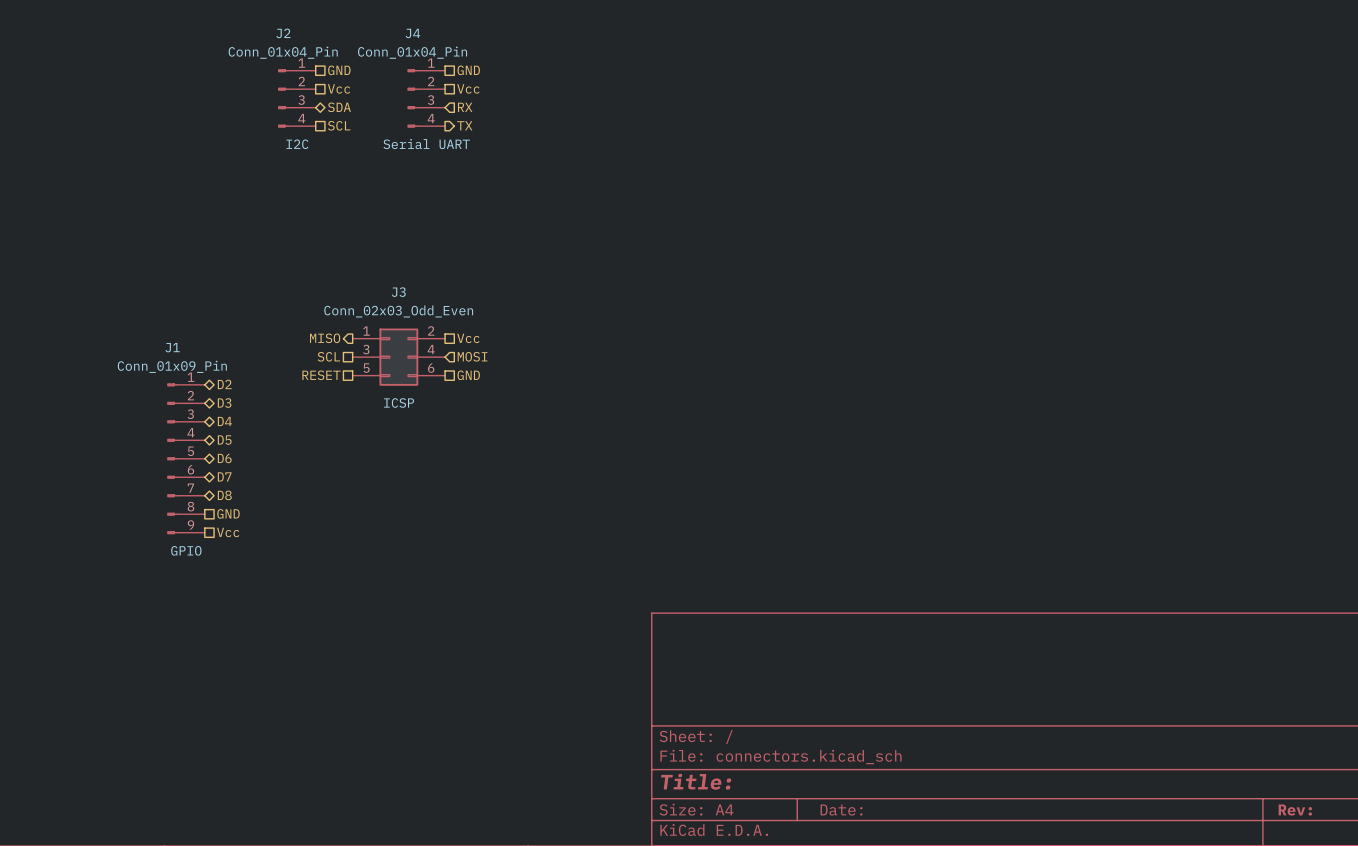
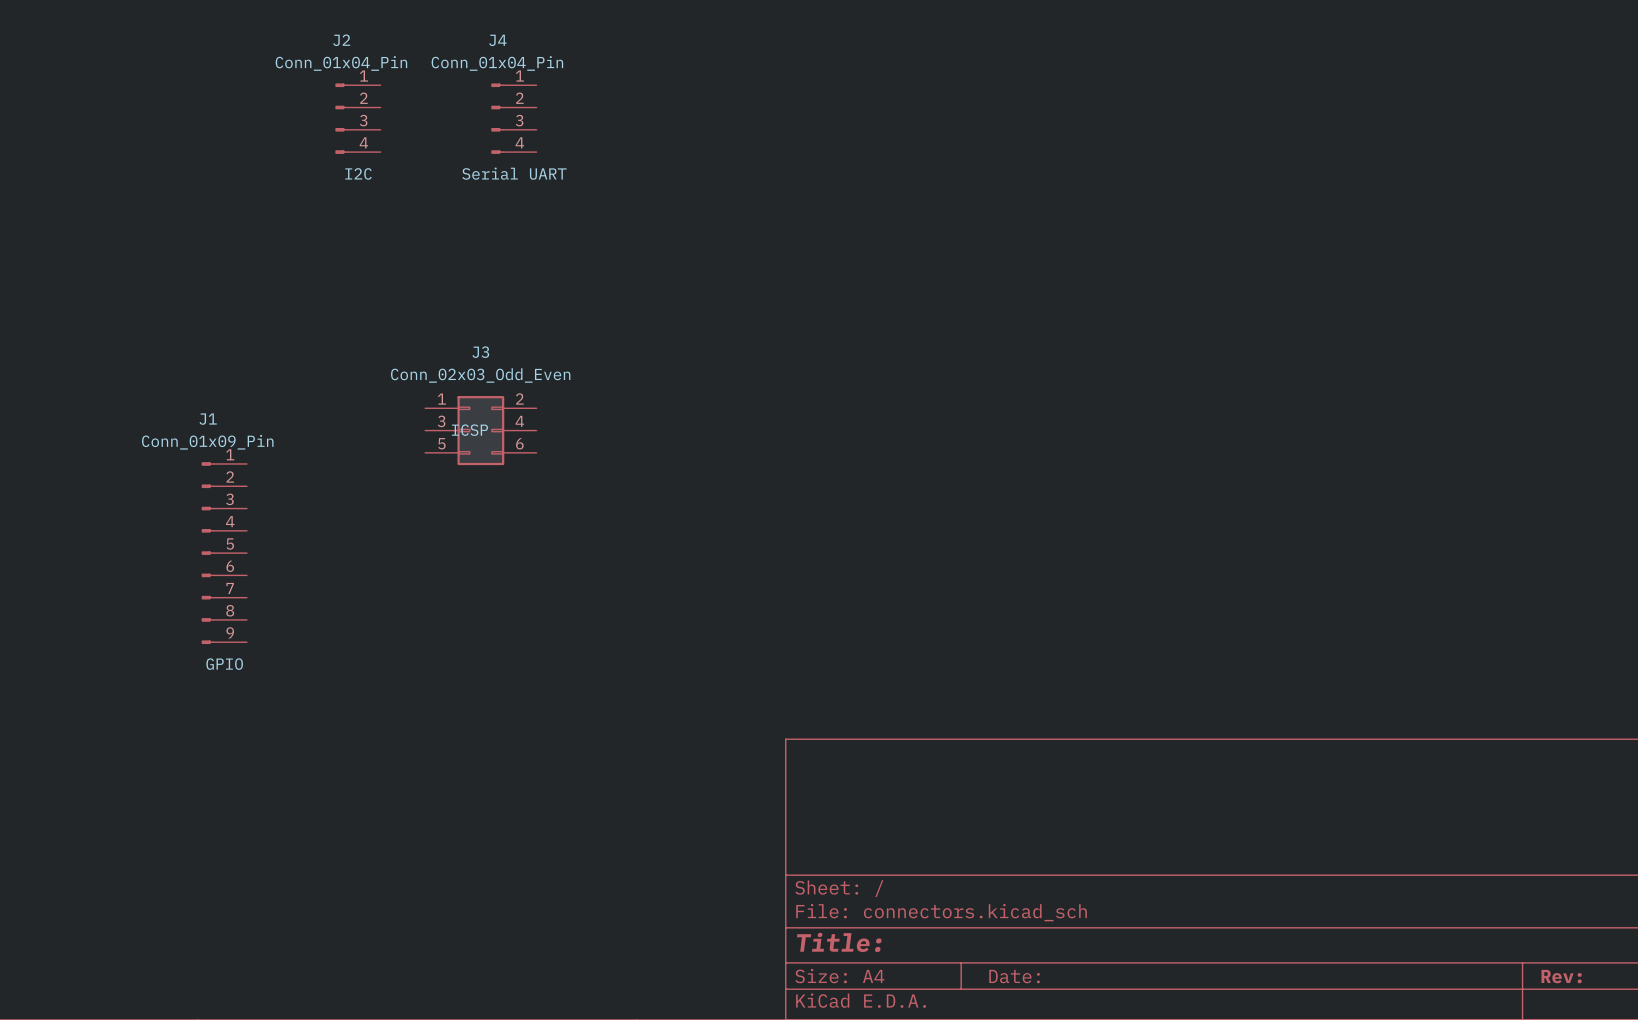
hierarchical label: GND (339, 70) -> none
hierarchical label: GND (468, 70) -> none
hierarchical label: Vcc (339, 88) -> none
hierarchical label: Vcc (468, 88) -> none
hierarchical label: SDA (339, 107) -> none
hierarchical label: RX (465, 107) -> none
hierarchical label: SCL (339, 125) -> none
hierarchical label: TX (464, 125) -> none
hierarchical label: MISO (325, 338) -> none
hierarchical label: Vcc (468, 338) -> none
hierarchical label: SCL (328, 356) -> none
hierarchical label: MOSI (472, 356) -> none
hierarchical label: RESET (321, 375) -> none
hierarchical label: GND (468, 375) -> none
hierarchical label: D2 (224, 384) -> none
hierarchical label: D3 (224, 403) -> none
J3 text position: ICSP (399, 403) -> ICSP (469, 430)
hierarchical label: D4 (224, 421) -> none
hierarchical label: D5 (224, 440) -> none
hierarchical label: D6 (224, 458) -> none
hierarchical label: D7 (224, 476) -> none
hierarchical label: D8 (224, 495) -> none
hierarchical label: GND (228, 513) -> none
hierarchical label: Vcc (228, 532) -> none

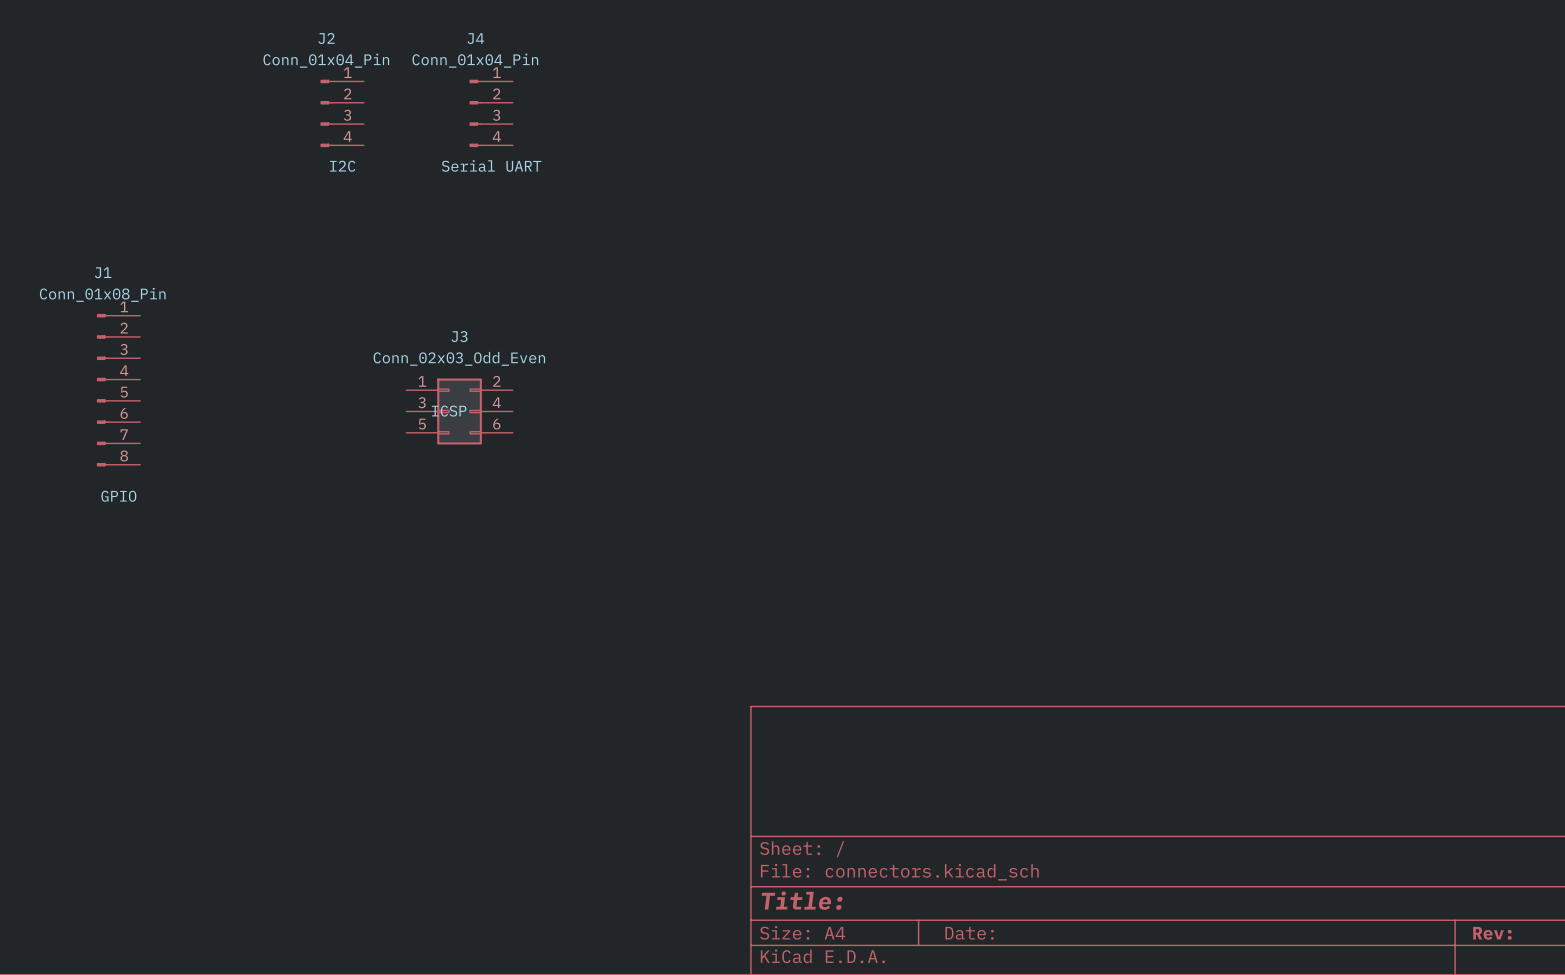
J1 value: Conn_01x09_Pin (207, 442) -> Conn_01x08_Pin (102, 294)
J1 symbol: [201, 462, 247, 645] -> [96, 313, 141, 467]

